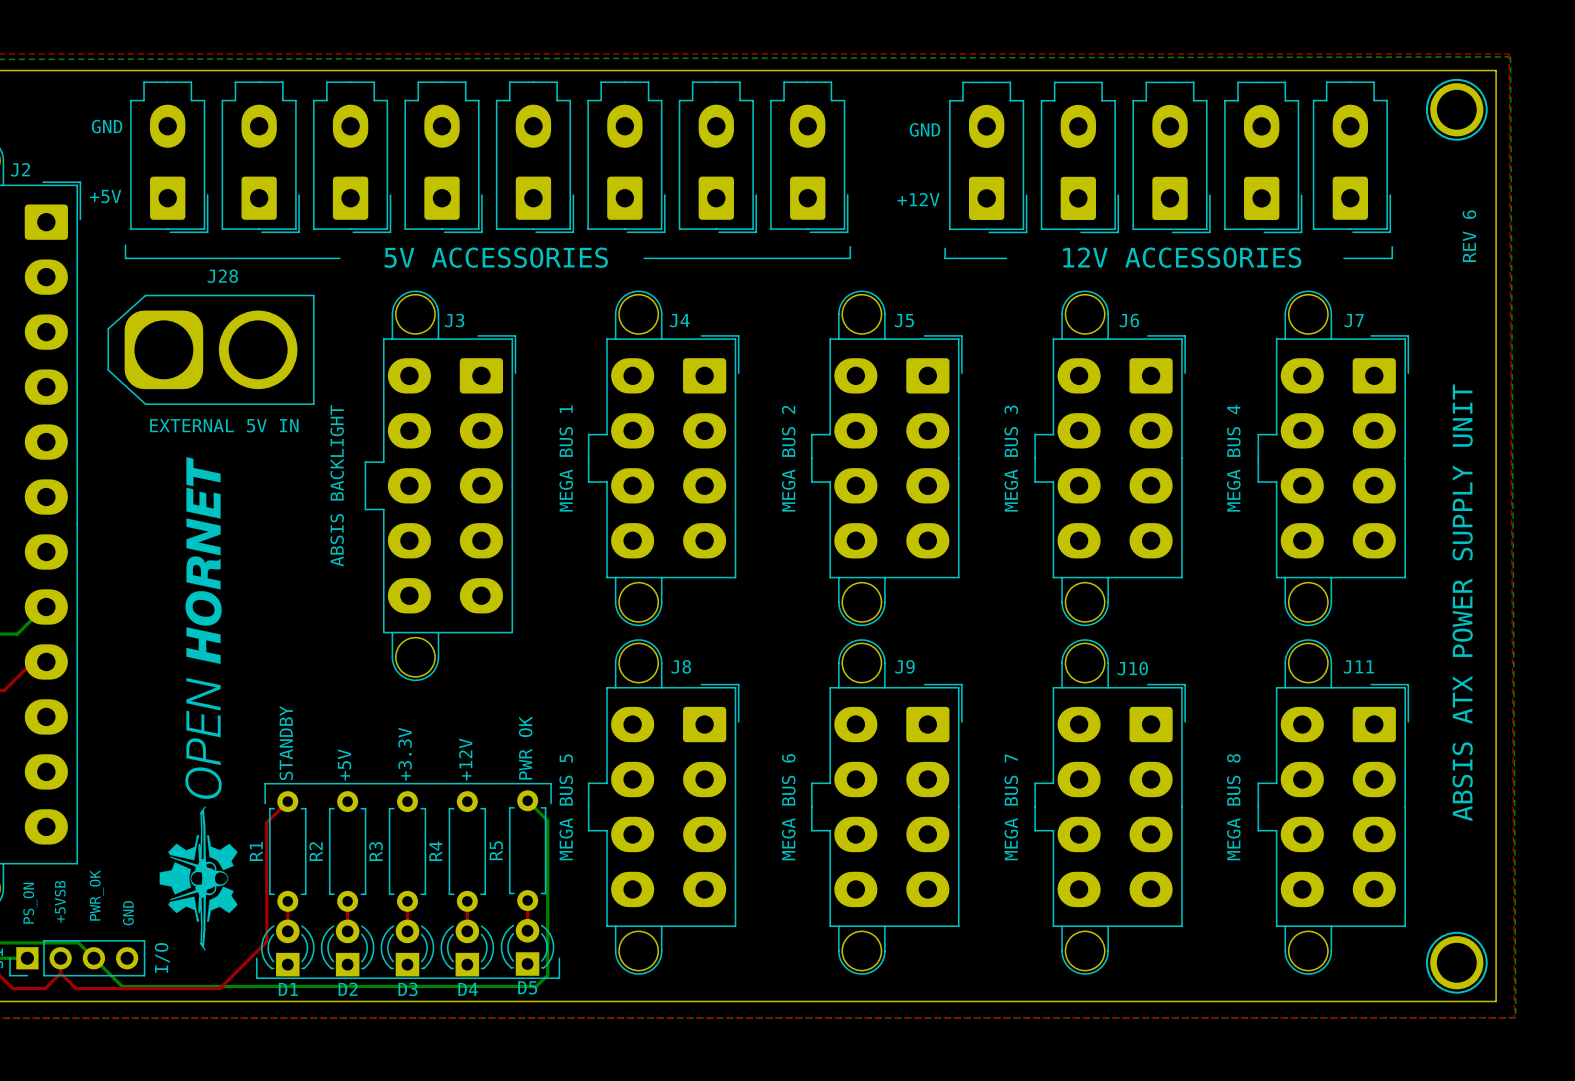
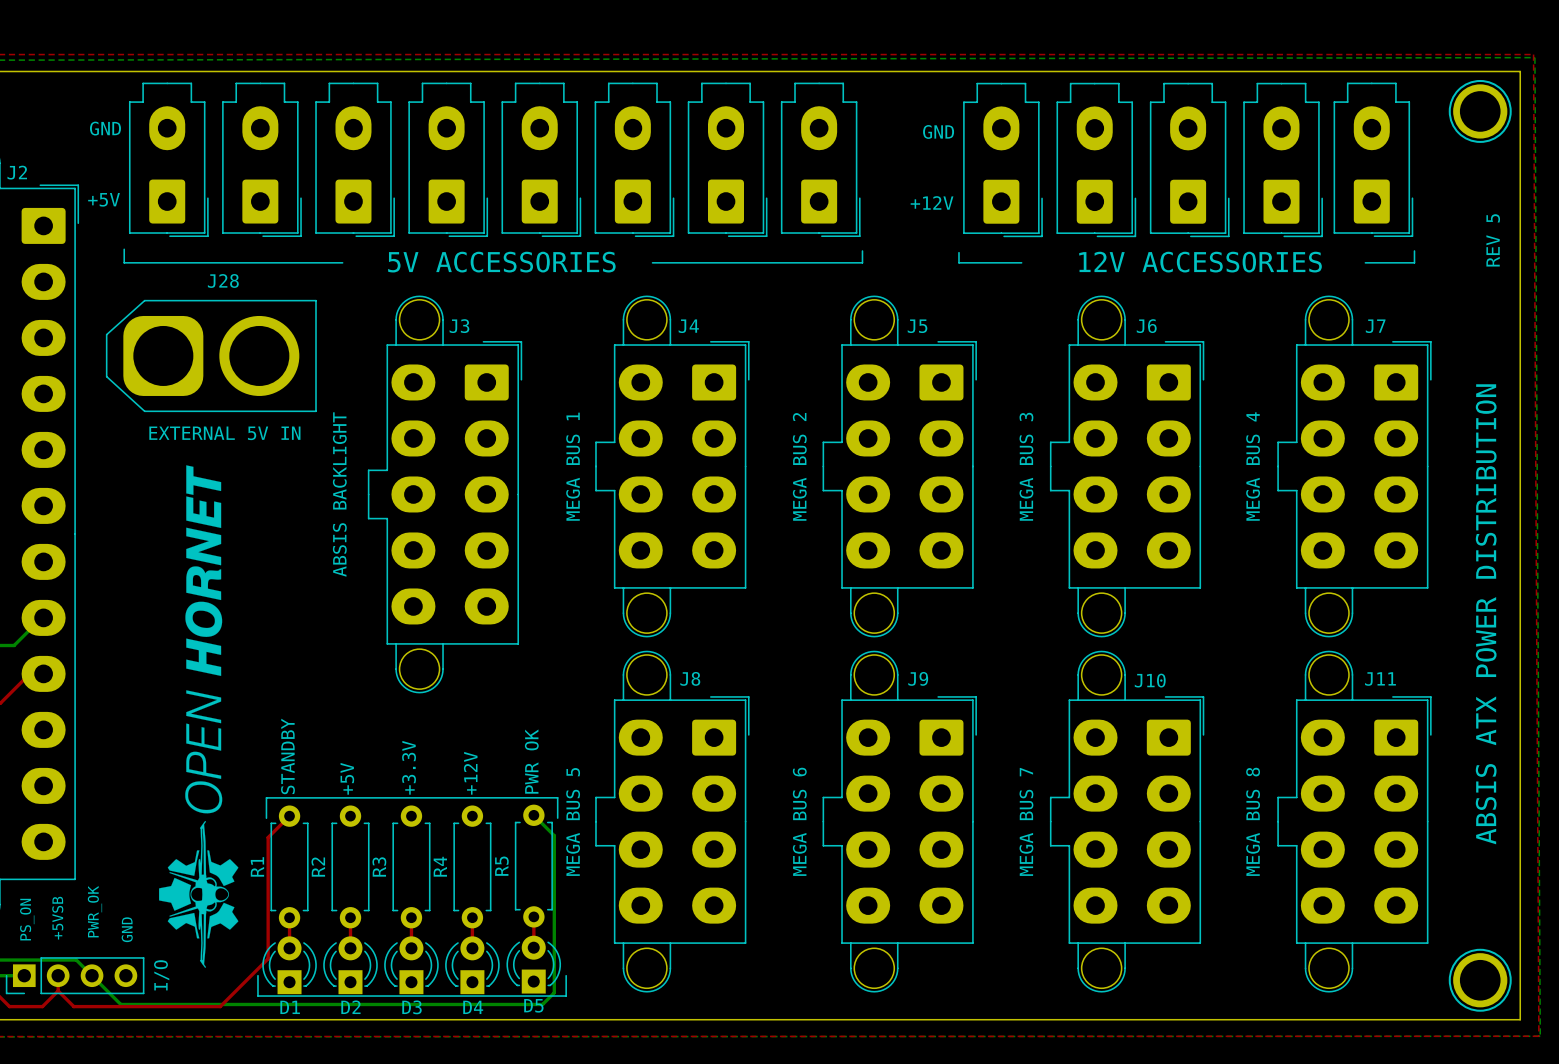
text: REV 6 (1469, 236) -> REV 5 (1493, 240)
text: ABSIS ATX POWER SUPPLY UNIT (1462, 602) -> ABSIS ATX POWER DISTRIBUTION (1486, 614)

